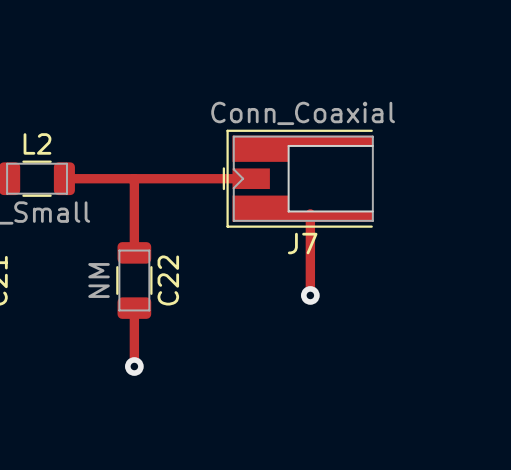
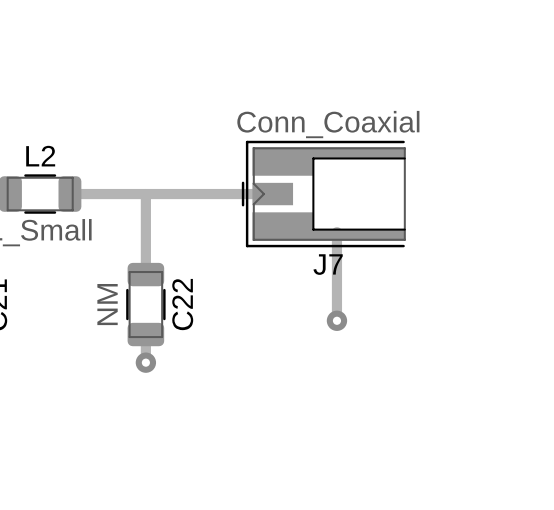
track: (134, 334) (134, 366) -> none
via position: (134, 366) -> (145, 362)

